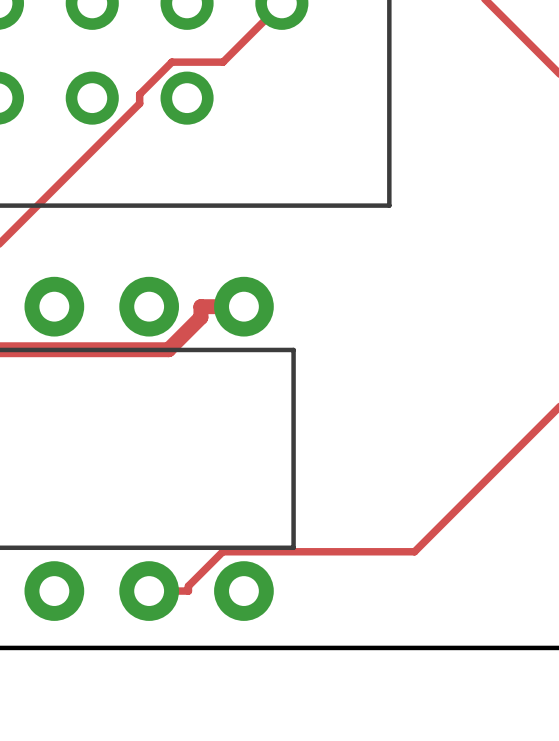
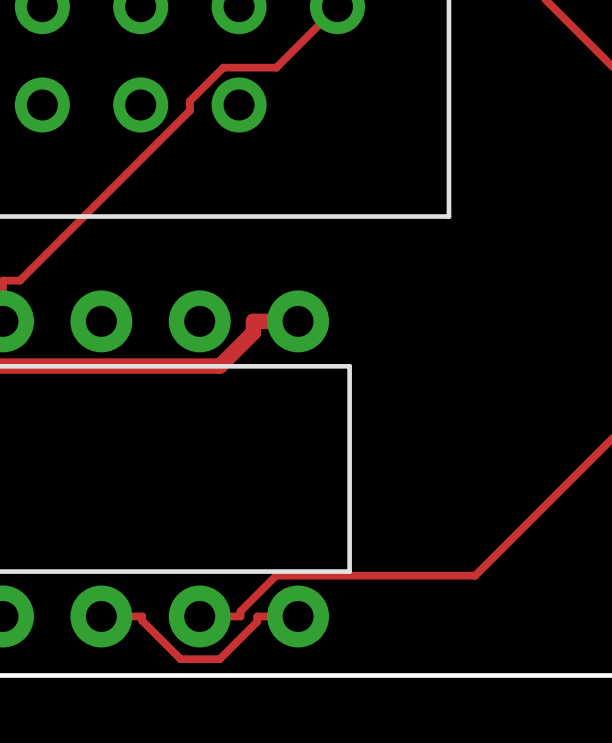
track: none -> (101, 616) (142, 616) (142, 620) (180, 659) (219, 659) (257, 621) (257, 616) (298, 616)

